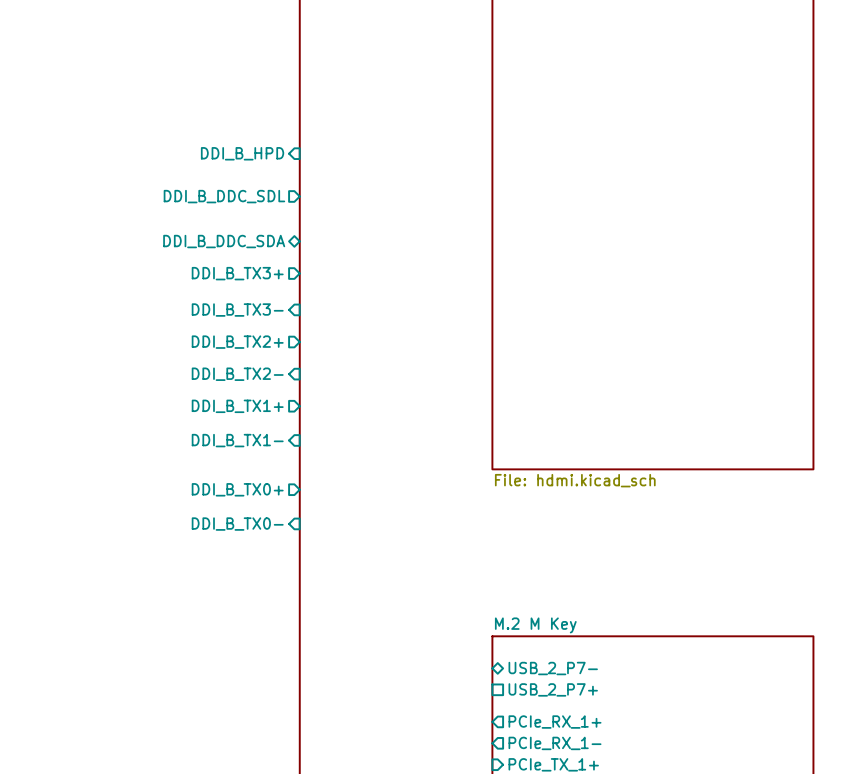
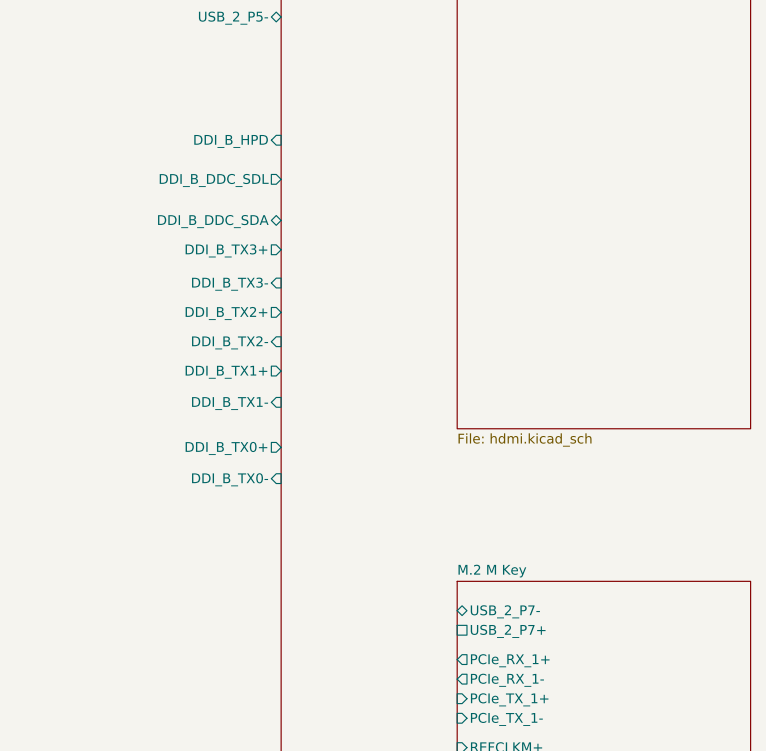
sheet pin: none -> USB_2_P5- (233, 18)

